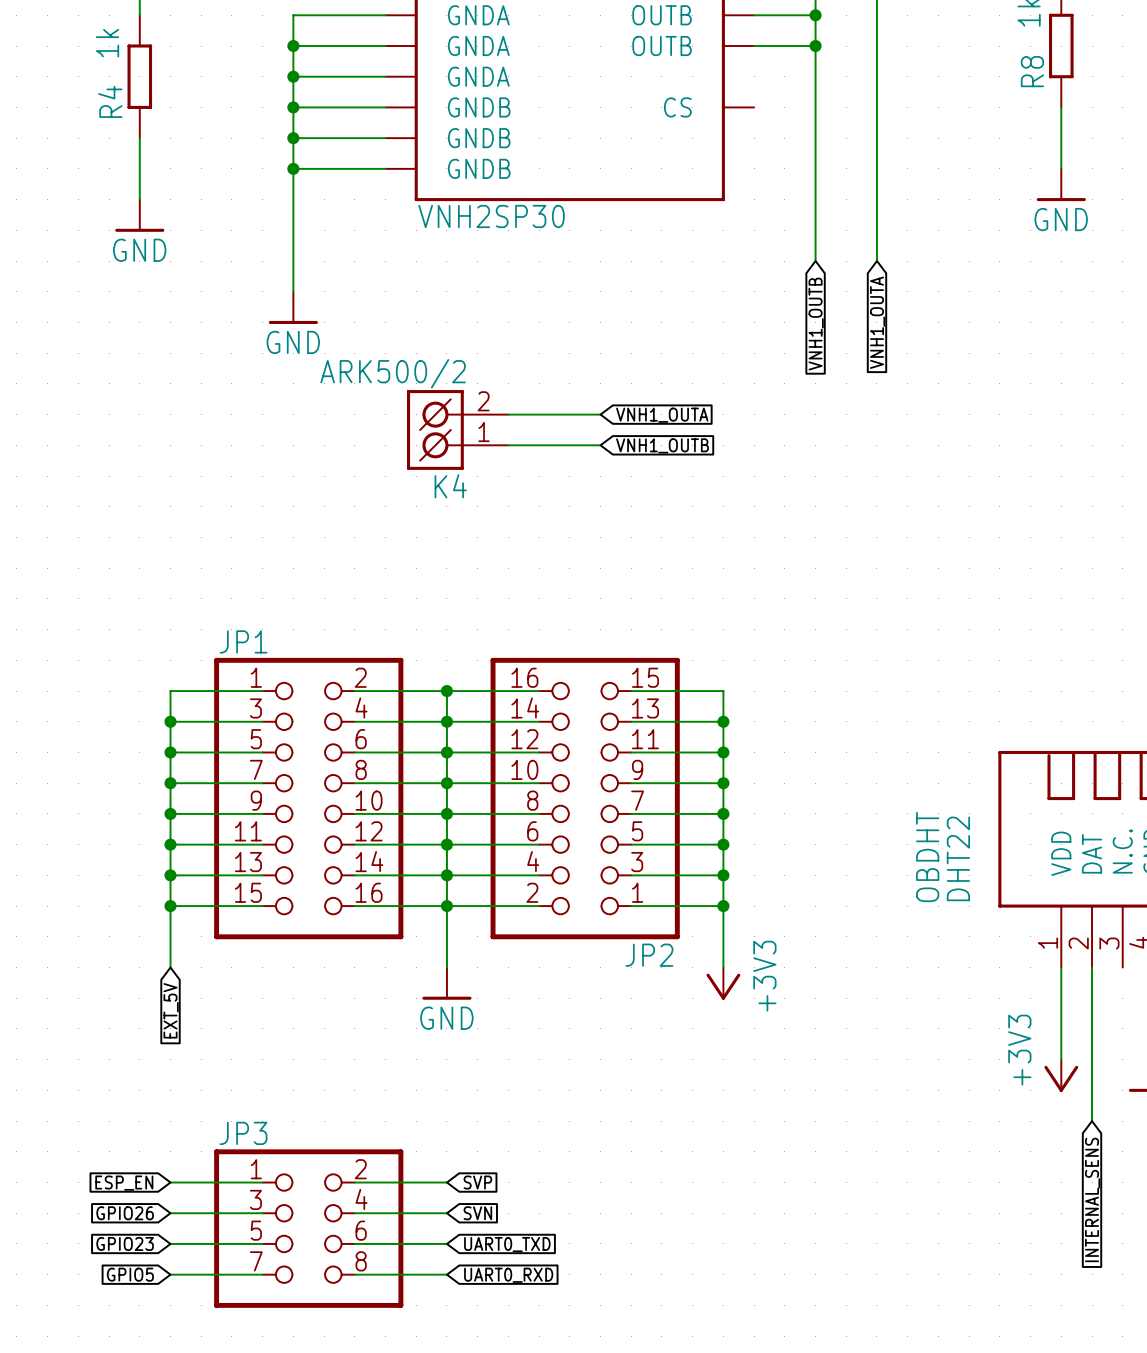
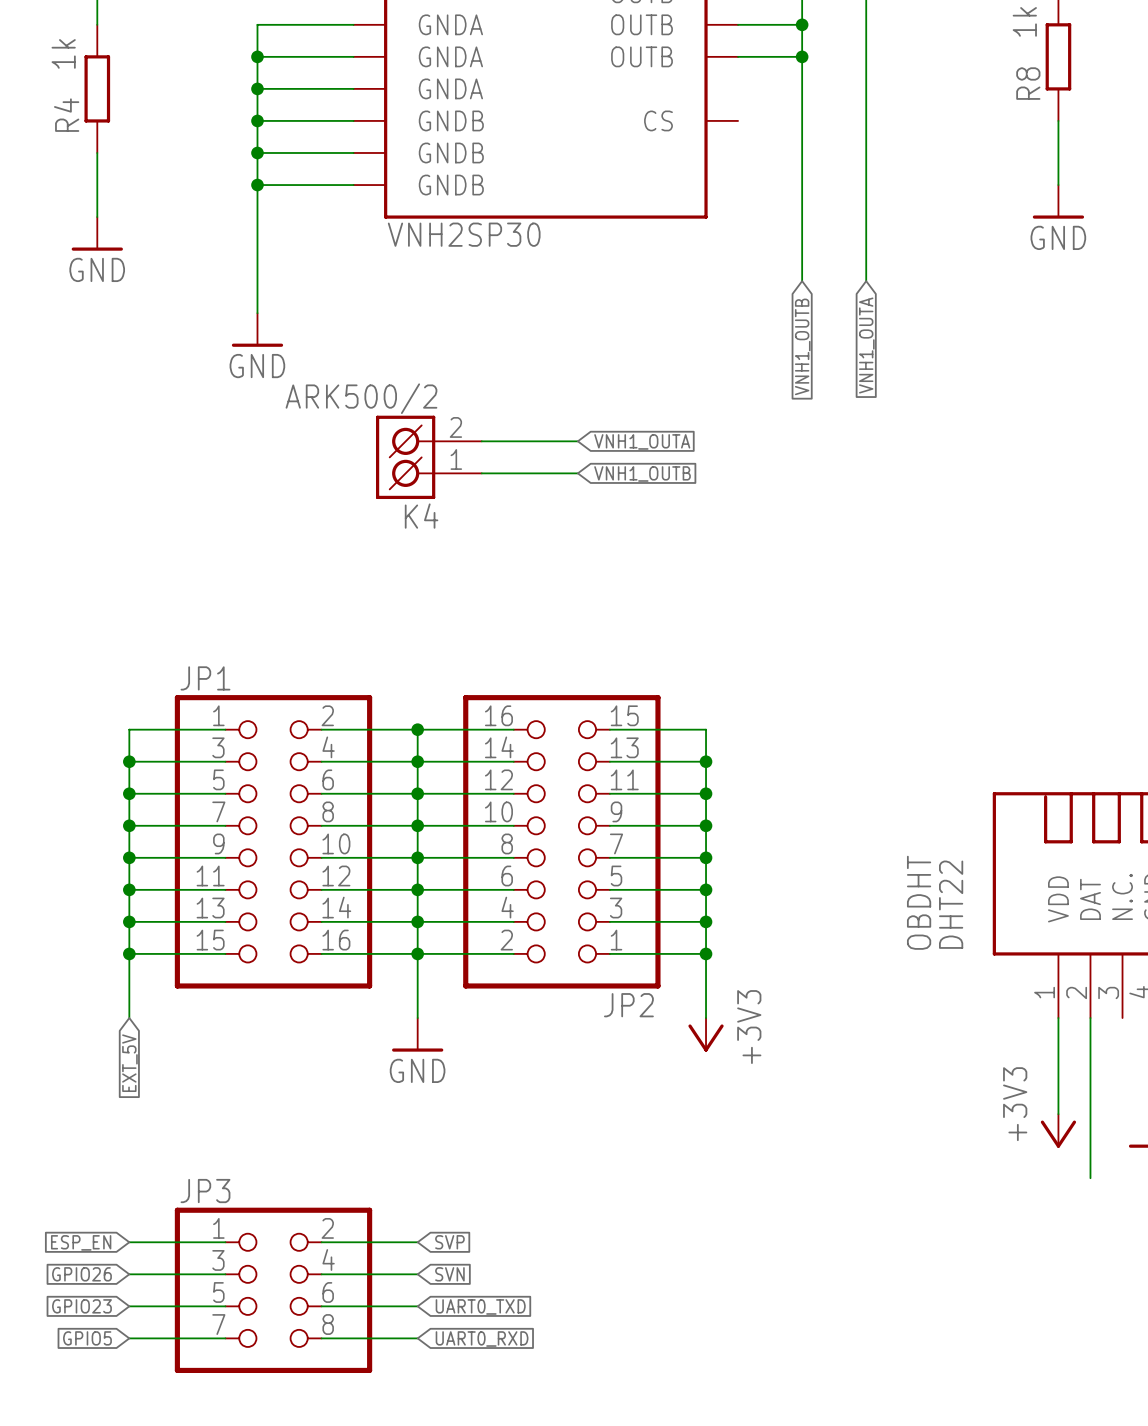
global label: INTERNAL_SENS (1092, 1199) -> none

